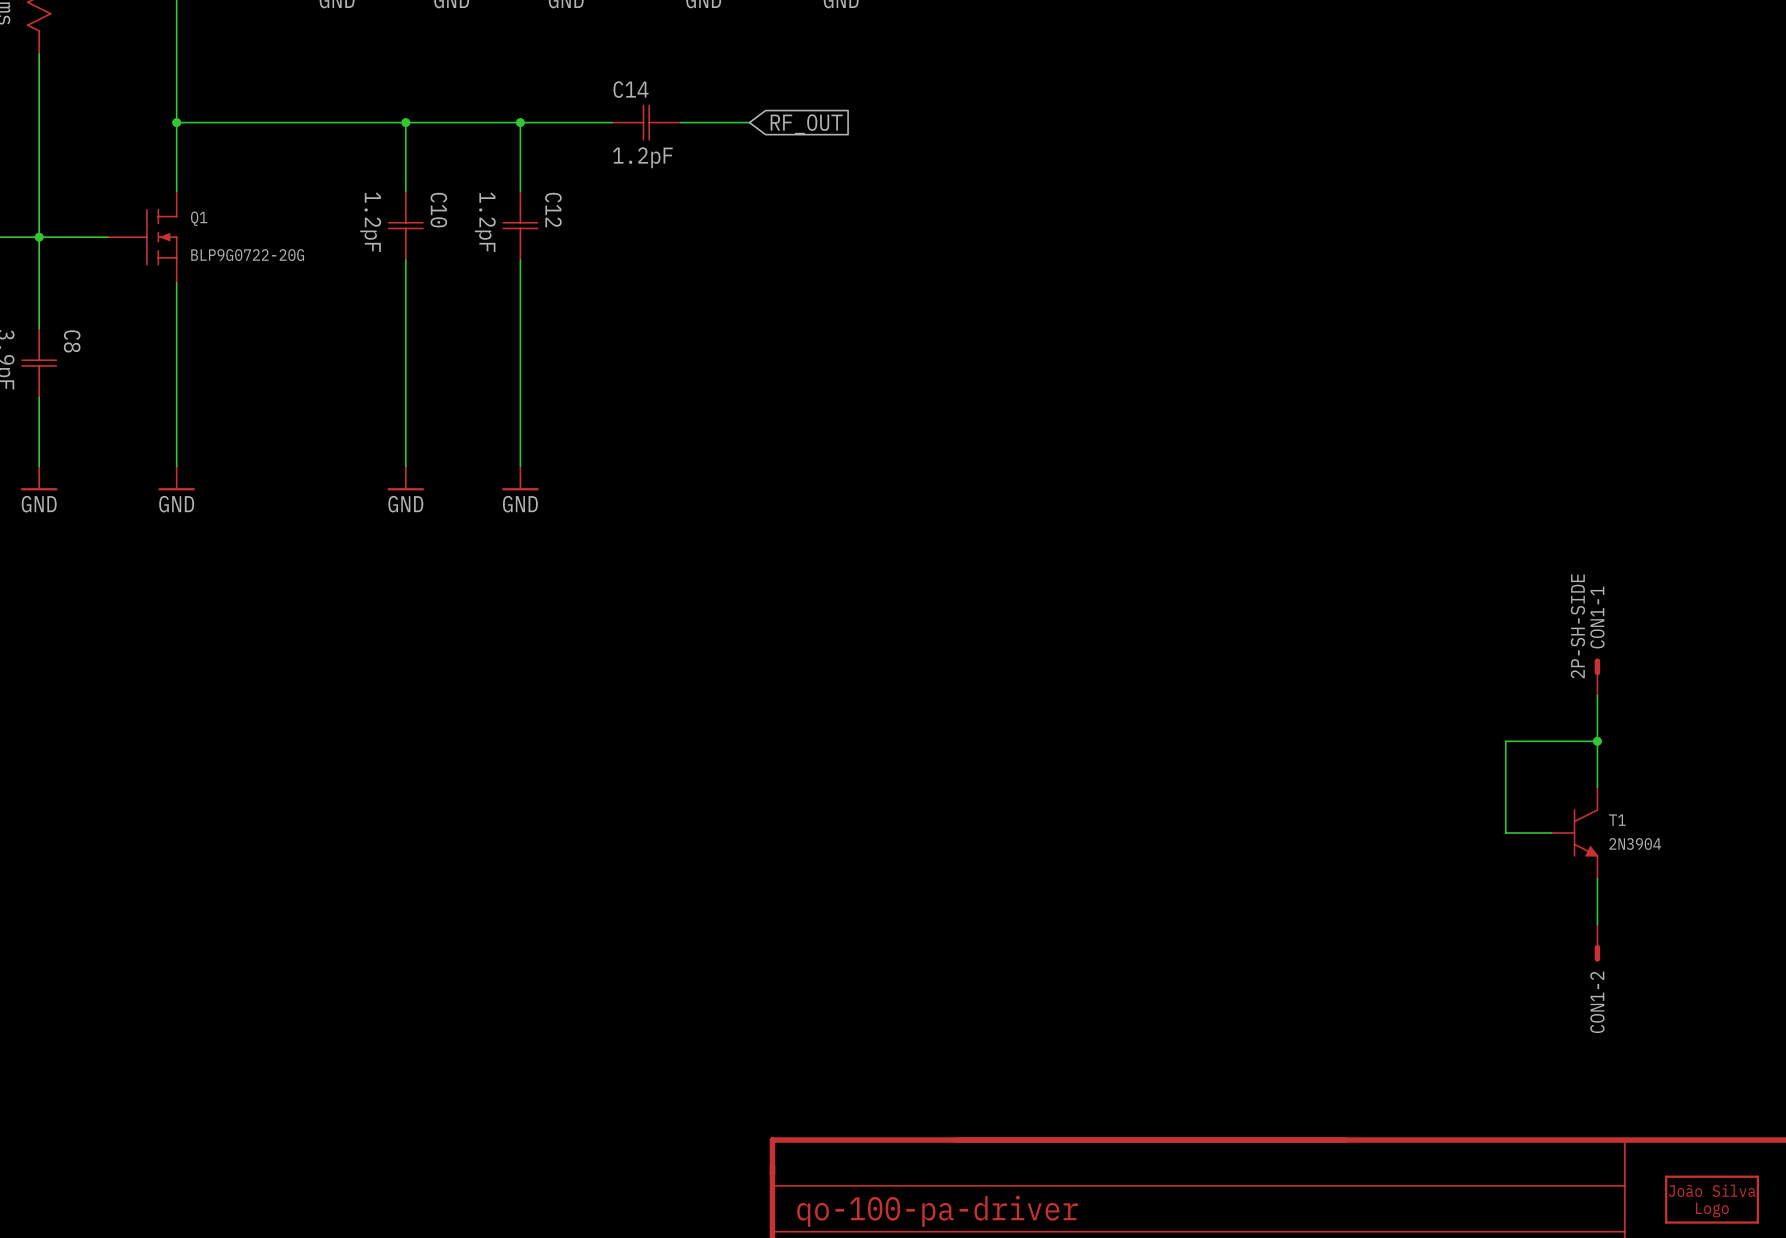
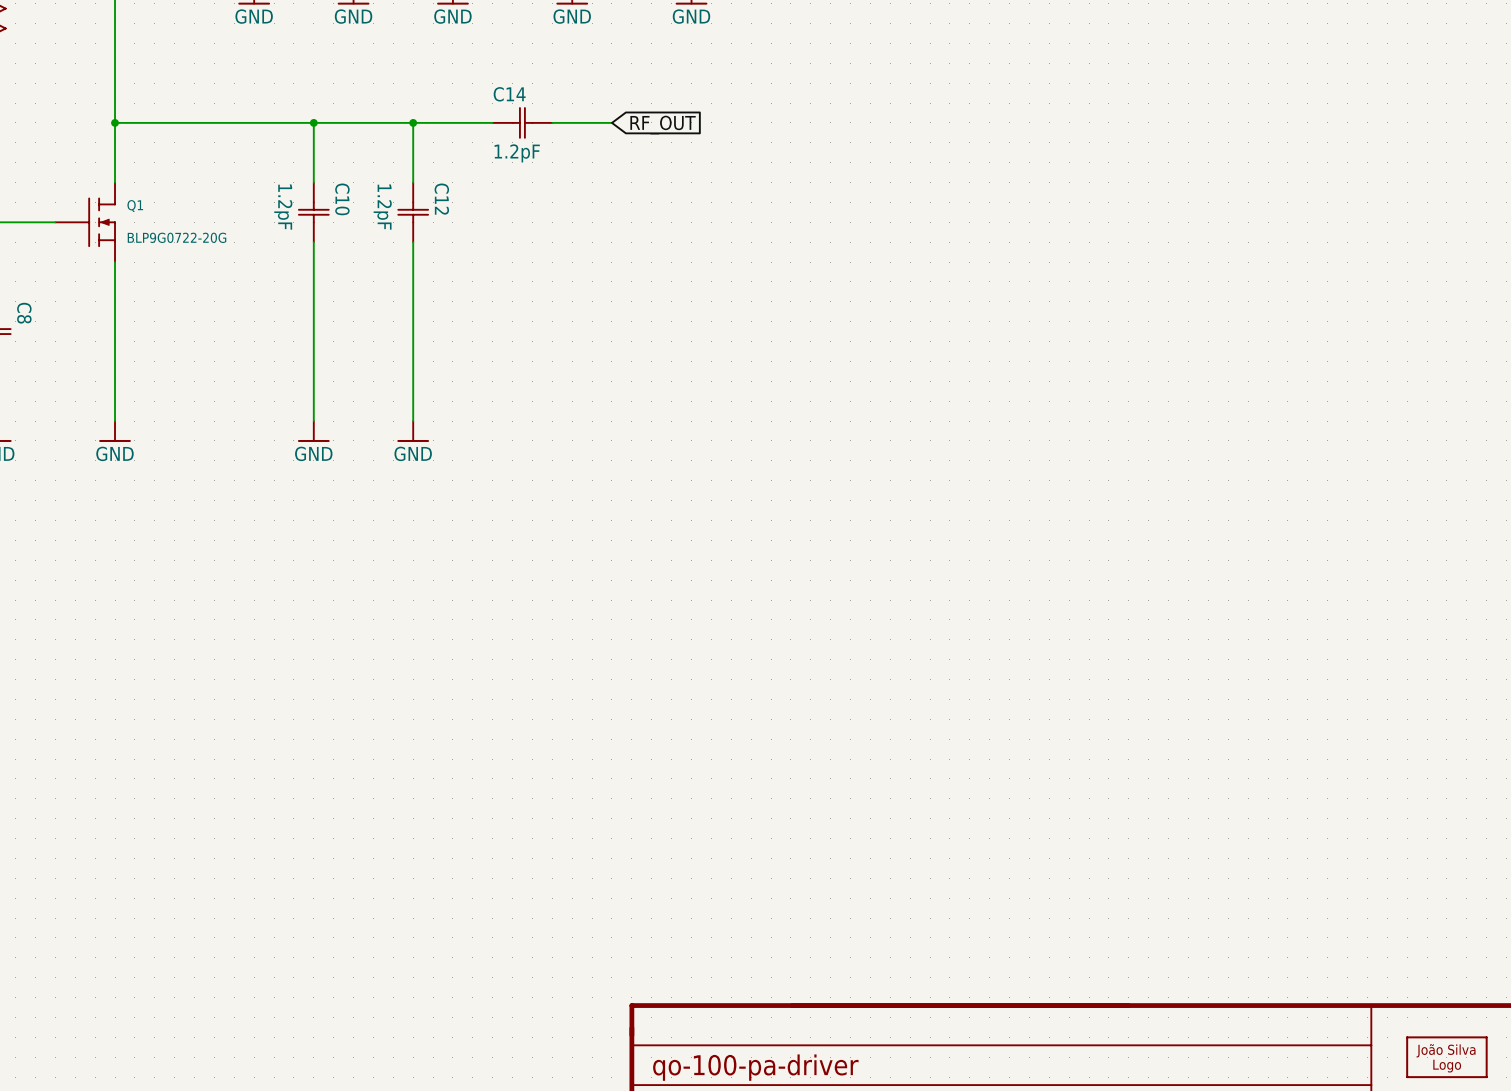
CON1-1: 2P-SH-SIDE (1597, 676) -> none
wire: (1597, 695) (1597, 787) -> none
wire: (1597, 741) (1505, 741) (1505, 832) (1551, 832) -> none
junction: (1597, 741) -> none
T1: 2N3904 (1574, 832) -> none
wire: (1597, 878) (1597, 924) -> none
CON1-2: (1597, 943) -> none

